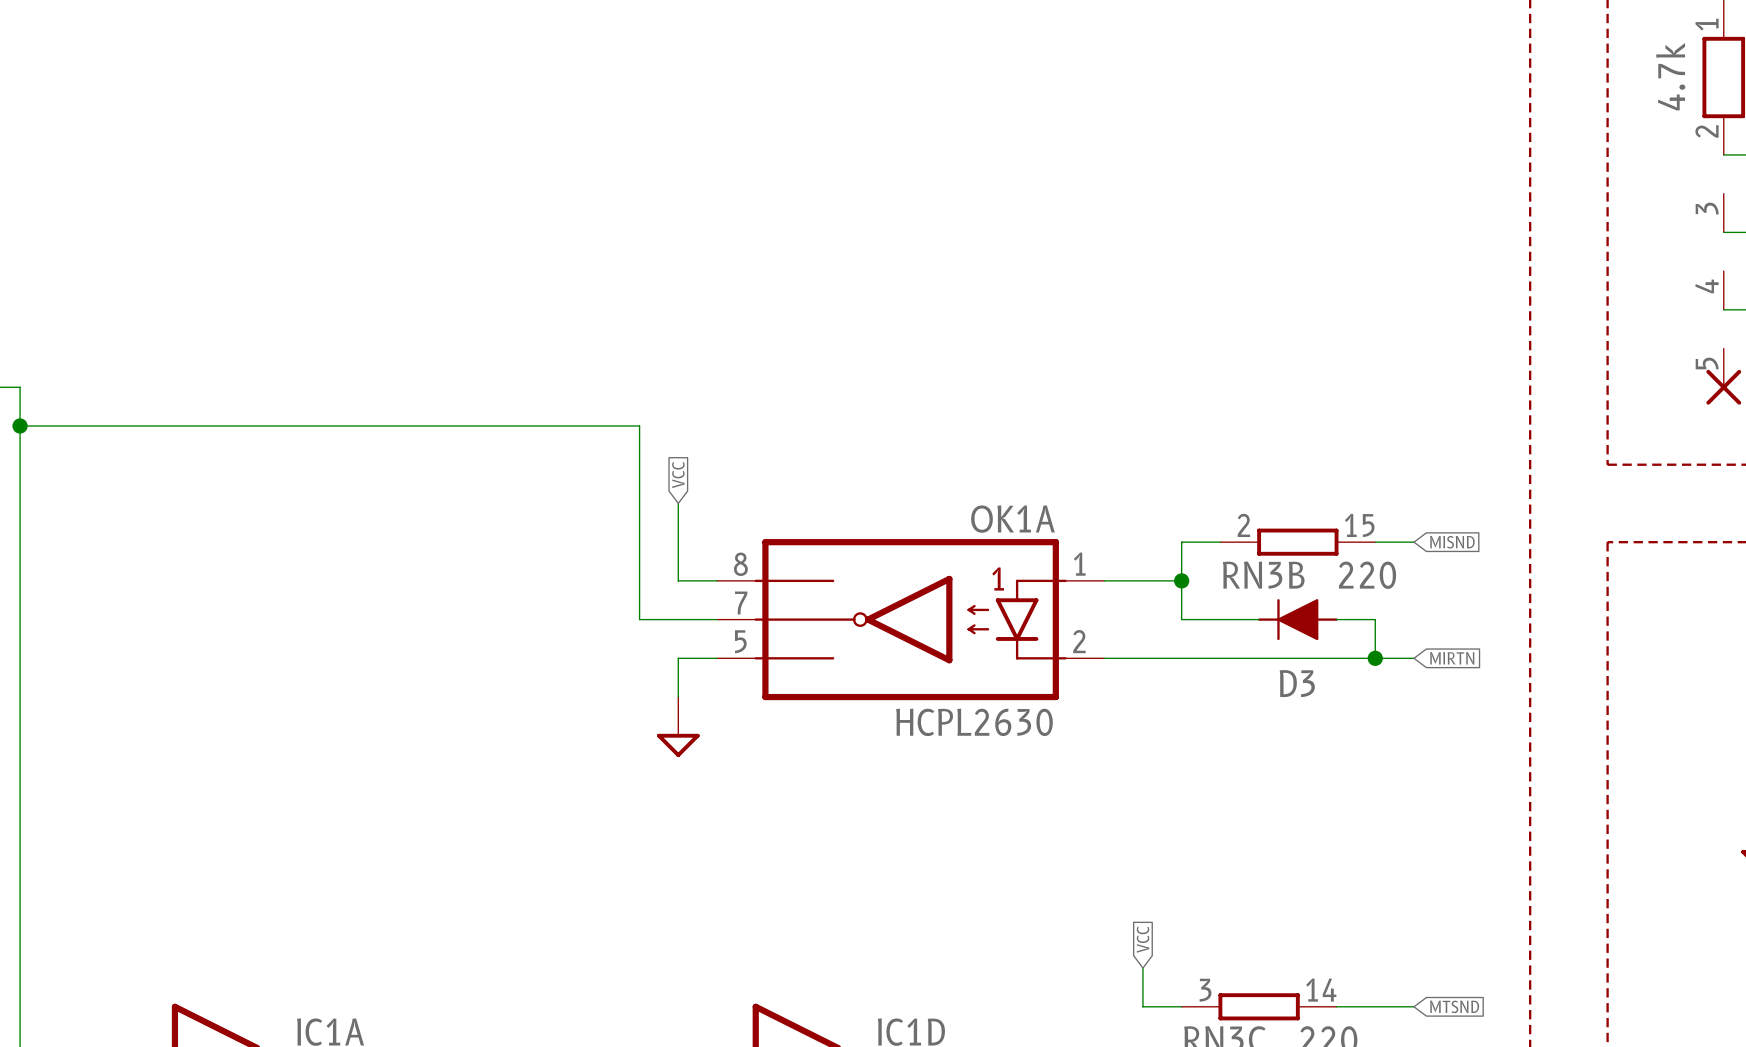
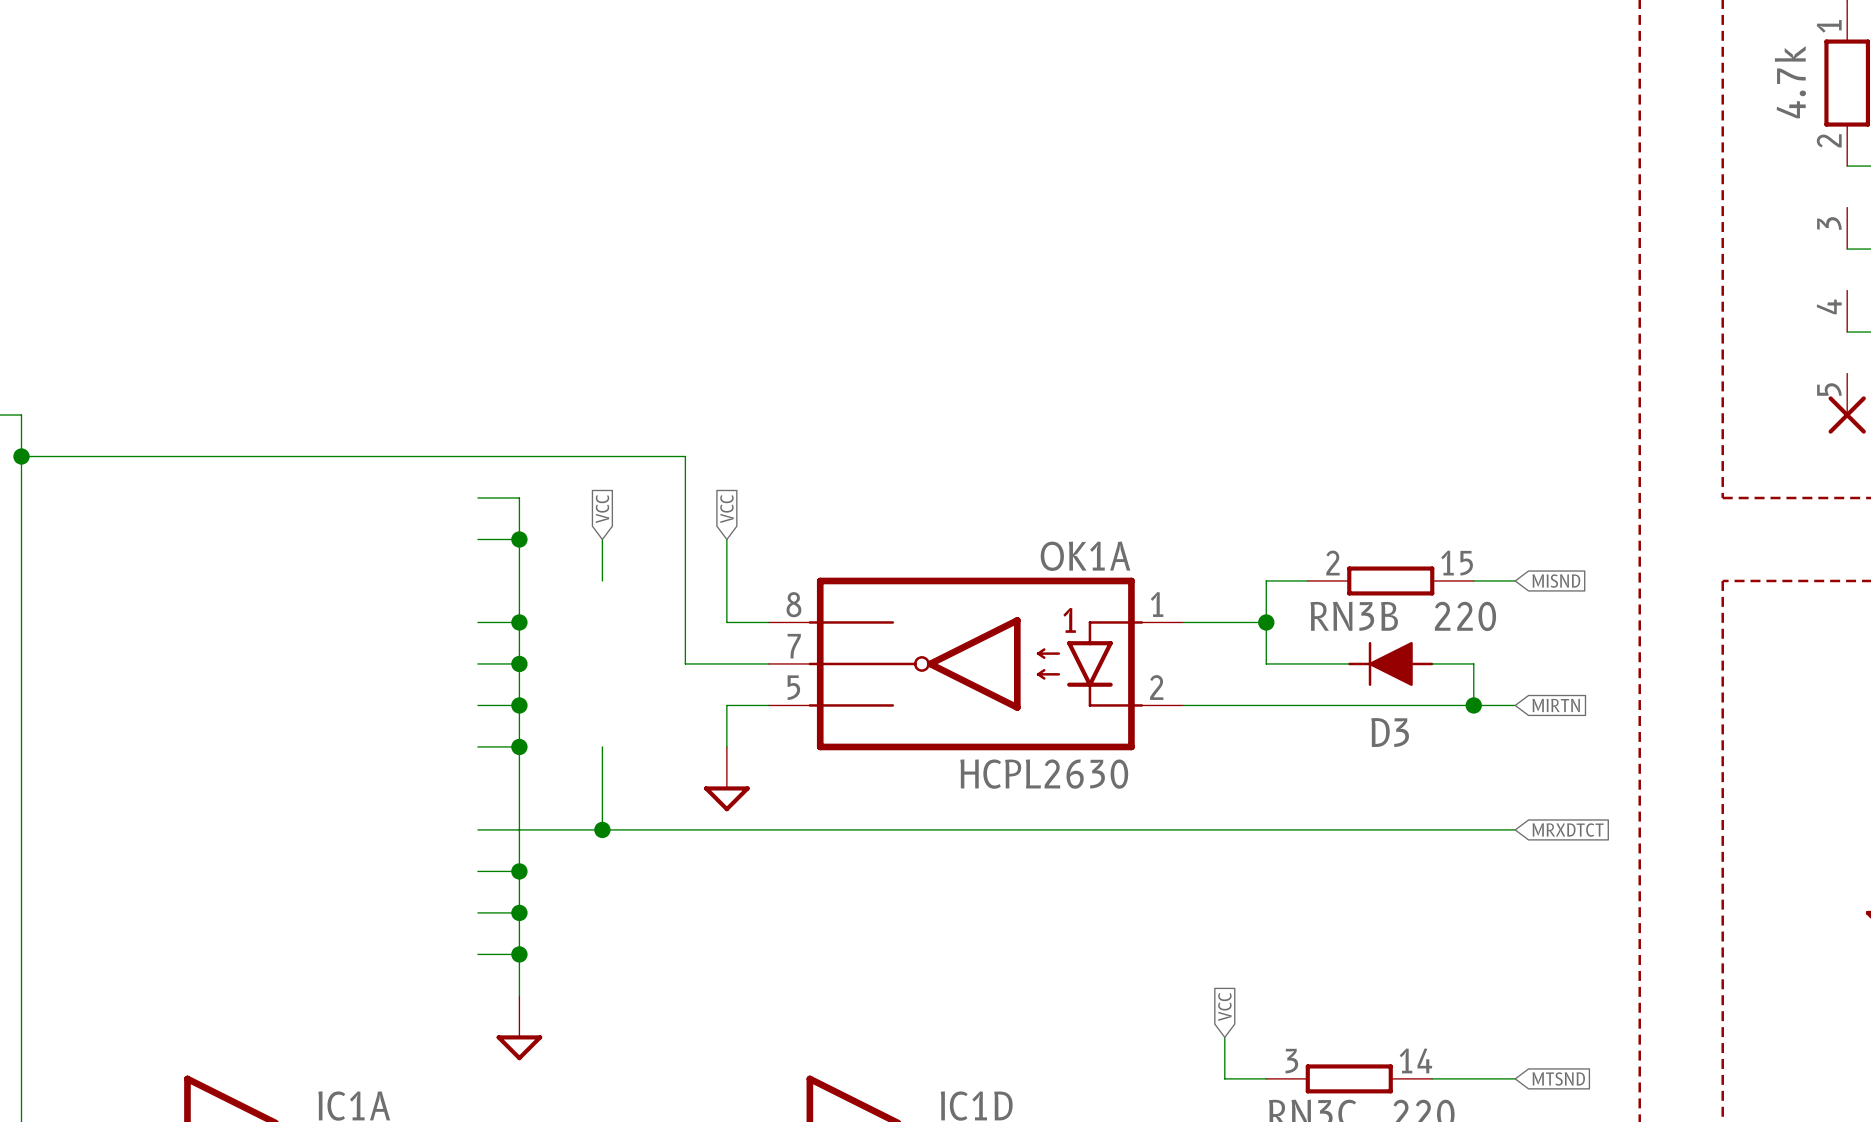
wire: none -> (477, 497) (519, 497) (519, 995)
global label: none -> VCC (602, 509)
wire: none -> (477, 539) (519, 539)
junction: none -> (519, 539)
wire: none -> (602, 539) (602, 580)
wire: none -> (477, 622) (519, 622)
junction: none -> (519, 622)
wire: none -> (477, 663) (519, 663)
junction: none -> (519, 663)
wire: none -> (477, 705) (519, 705)
junction: none -> (519, 705)
wire: none -> (477, 746) (519, 746)
junction: none -> (519, 746)
wire: none -> (602, 746) (602, 829)
wire: none -> (477, 829) (1515, 829)
junction: none -> (602, 829)
global label: none -> MRXDTCT (1568, 830)
wire: none -> (477, 871) (519, 871)
junction: none -> (519, 871)
wire: none -> (477, 912) (519, 912)
junction: none -> (519, 912)
wire: none -> (477, 954) (519, 954)
junction: none -> (519, 954)
power symbol: none -> (519, 1028)

